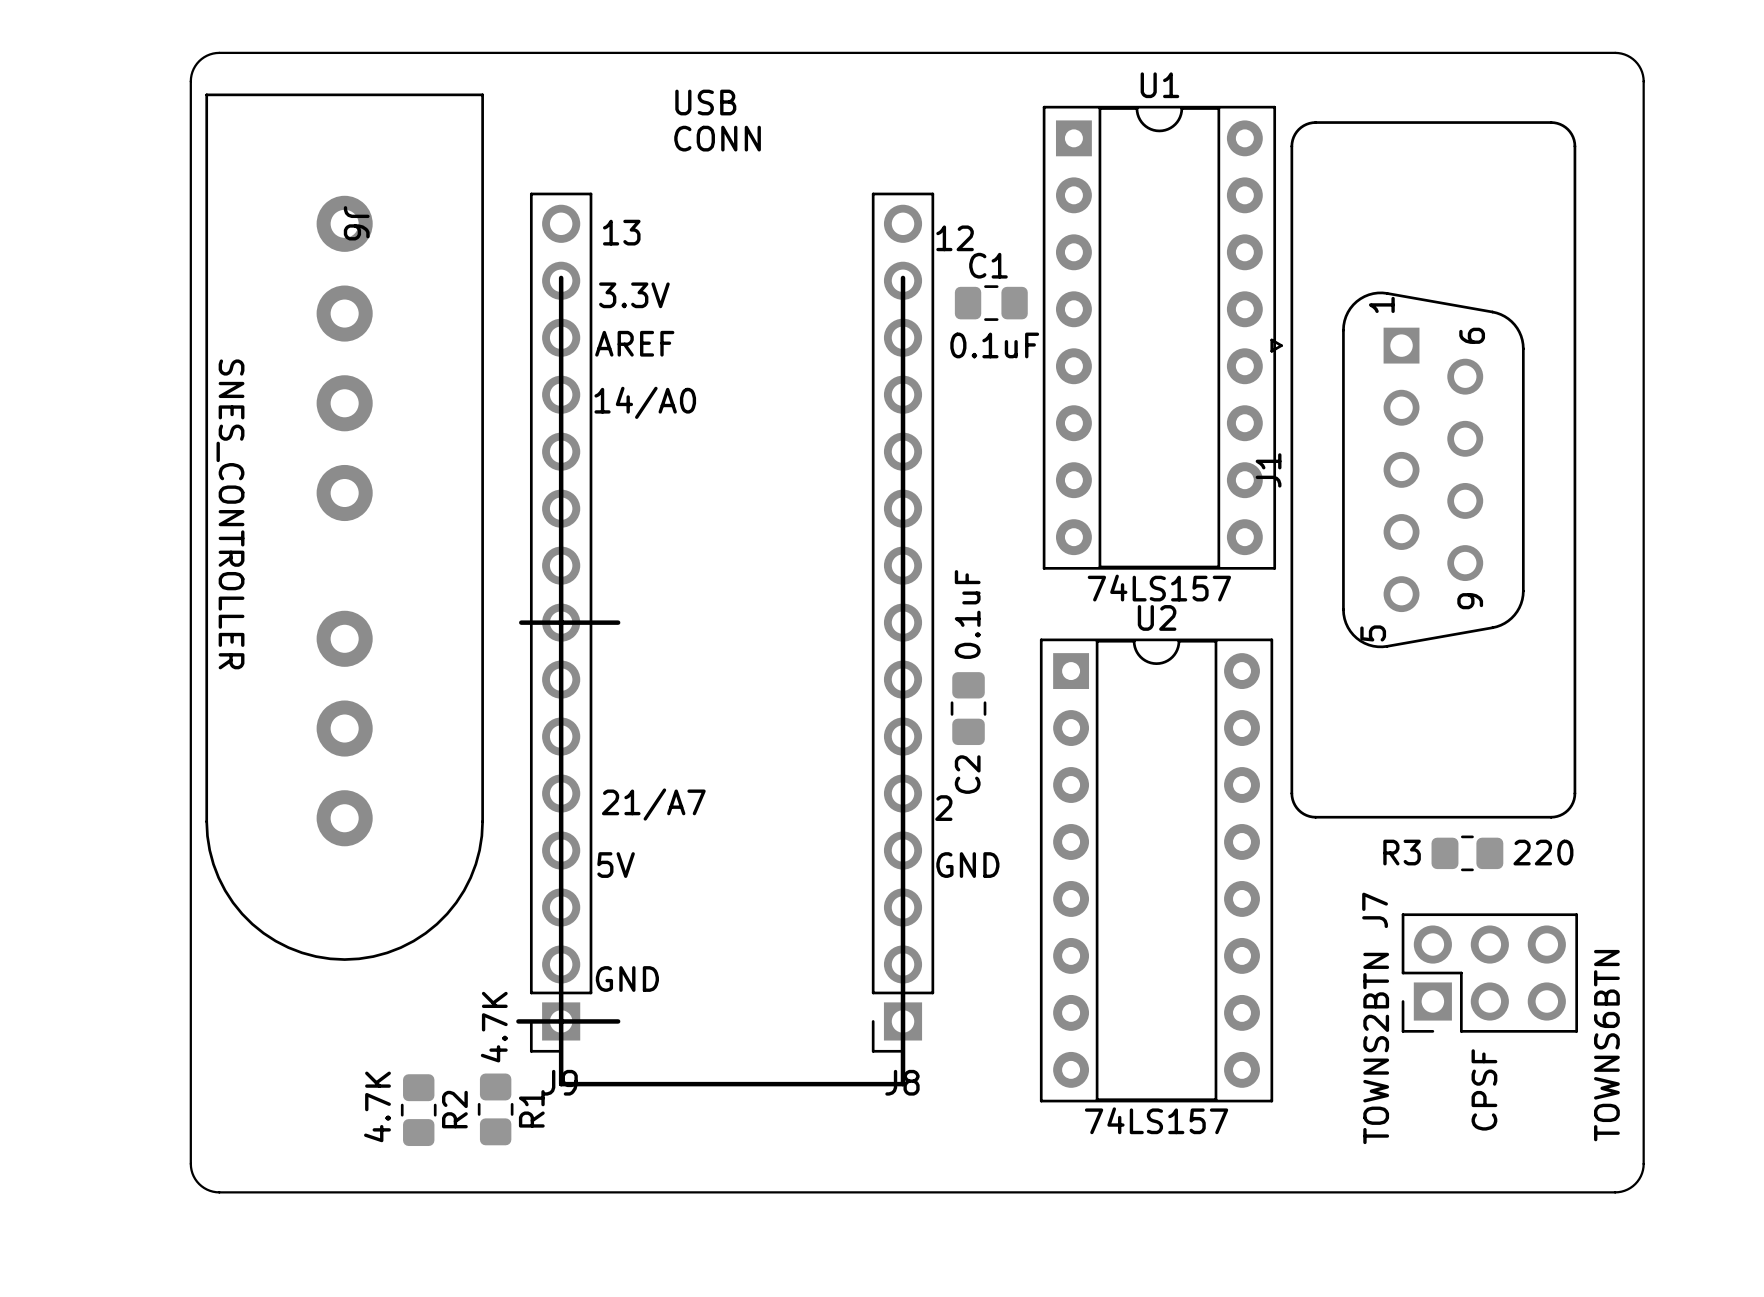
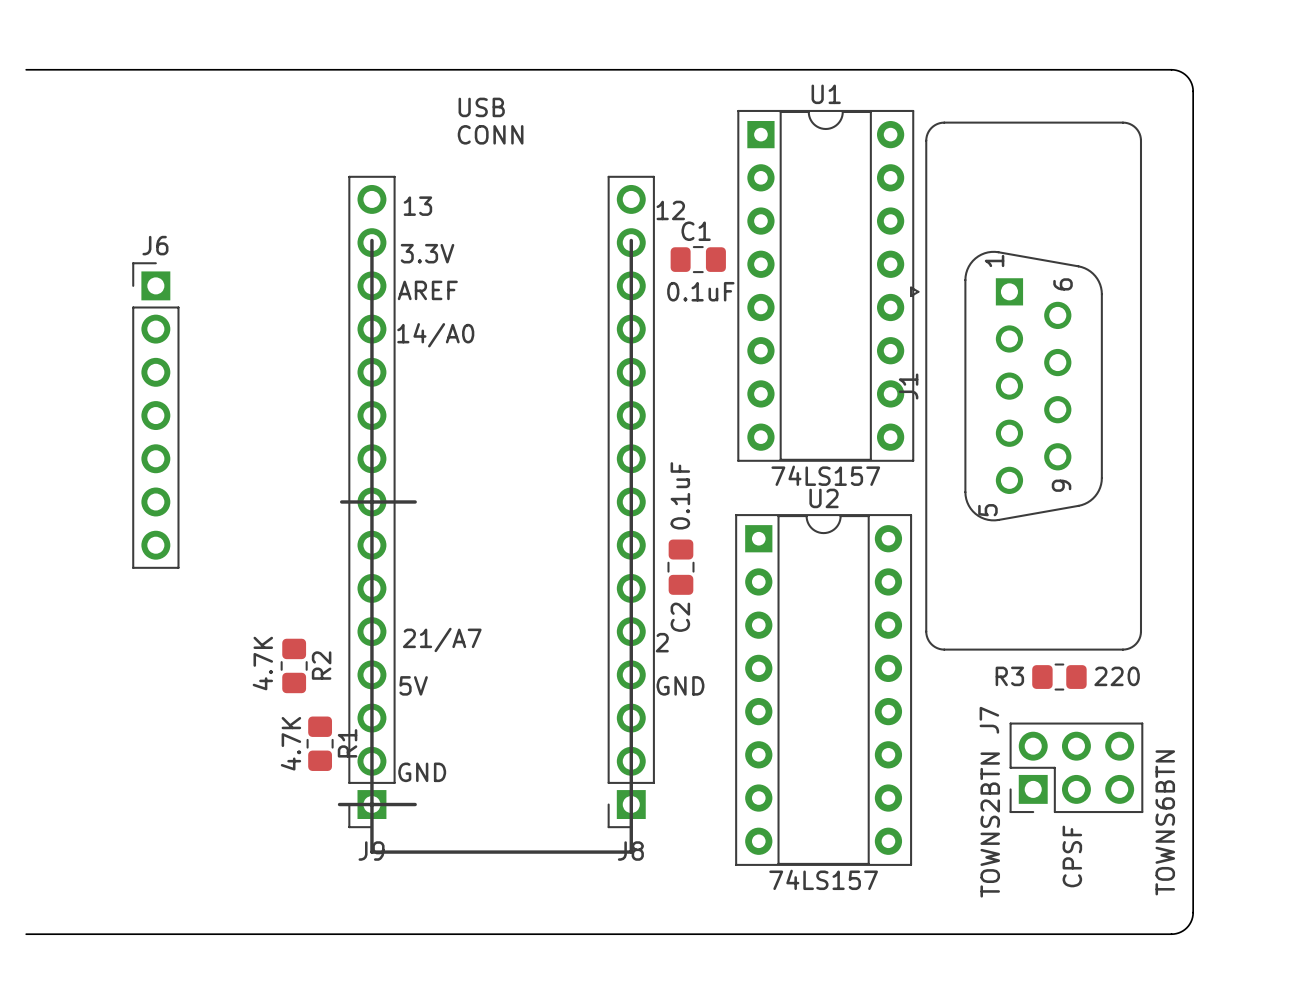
board edge: (219, 52) (206, 55) (199, 61) (192, 71) (190, 81) (190, 1163) (193, 1176) (199, 1184) (206, 1189) (219, 1192) -> (112, 69) (26, 69)
J6 footprint: [205, 93, 484, 961] -> [132, 262, 180, 569]
J6 name position: J6 (356, 223) -> J6 (155, 245)
J6 value: SNES_CONTROLLER (230, 514) -> none
R1 value position: 4.7K (494, 1027) -> 4.7K (290, 743)
R1 position: (495, 1109) -> (320, 743)
R2 position: (418, 1110) -> (294, 665)
board edge: none -> (26, 934) (112, 934)

